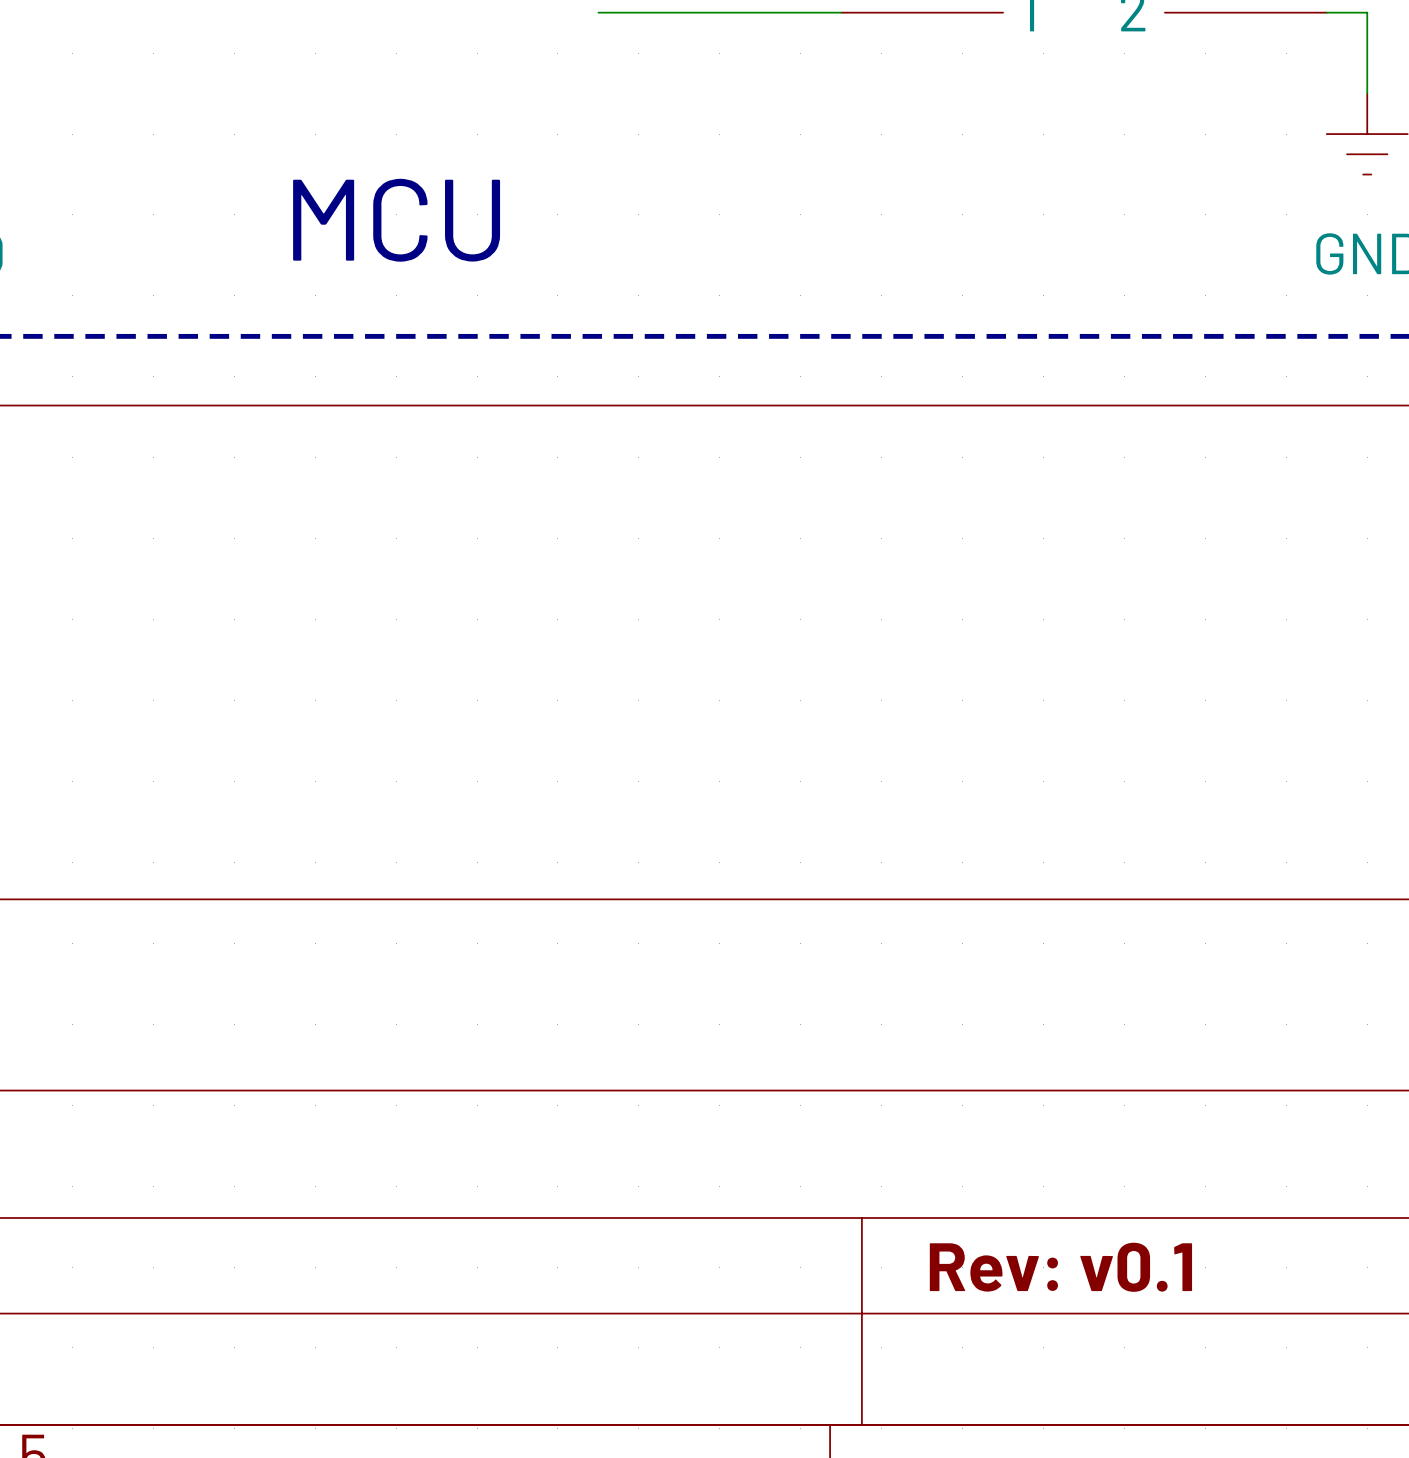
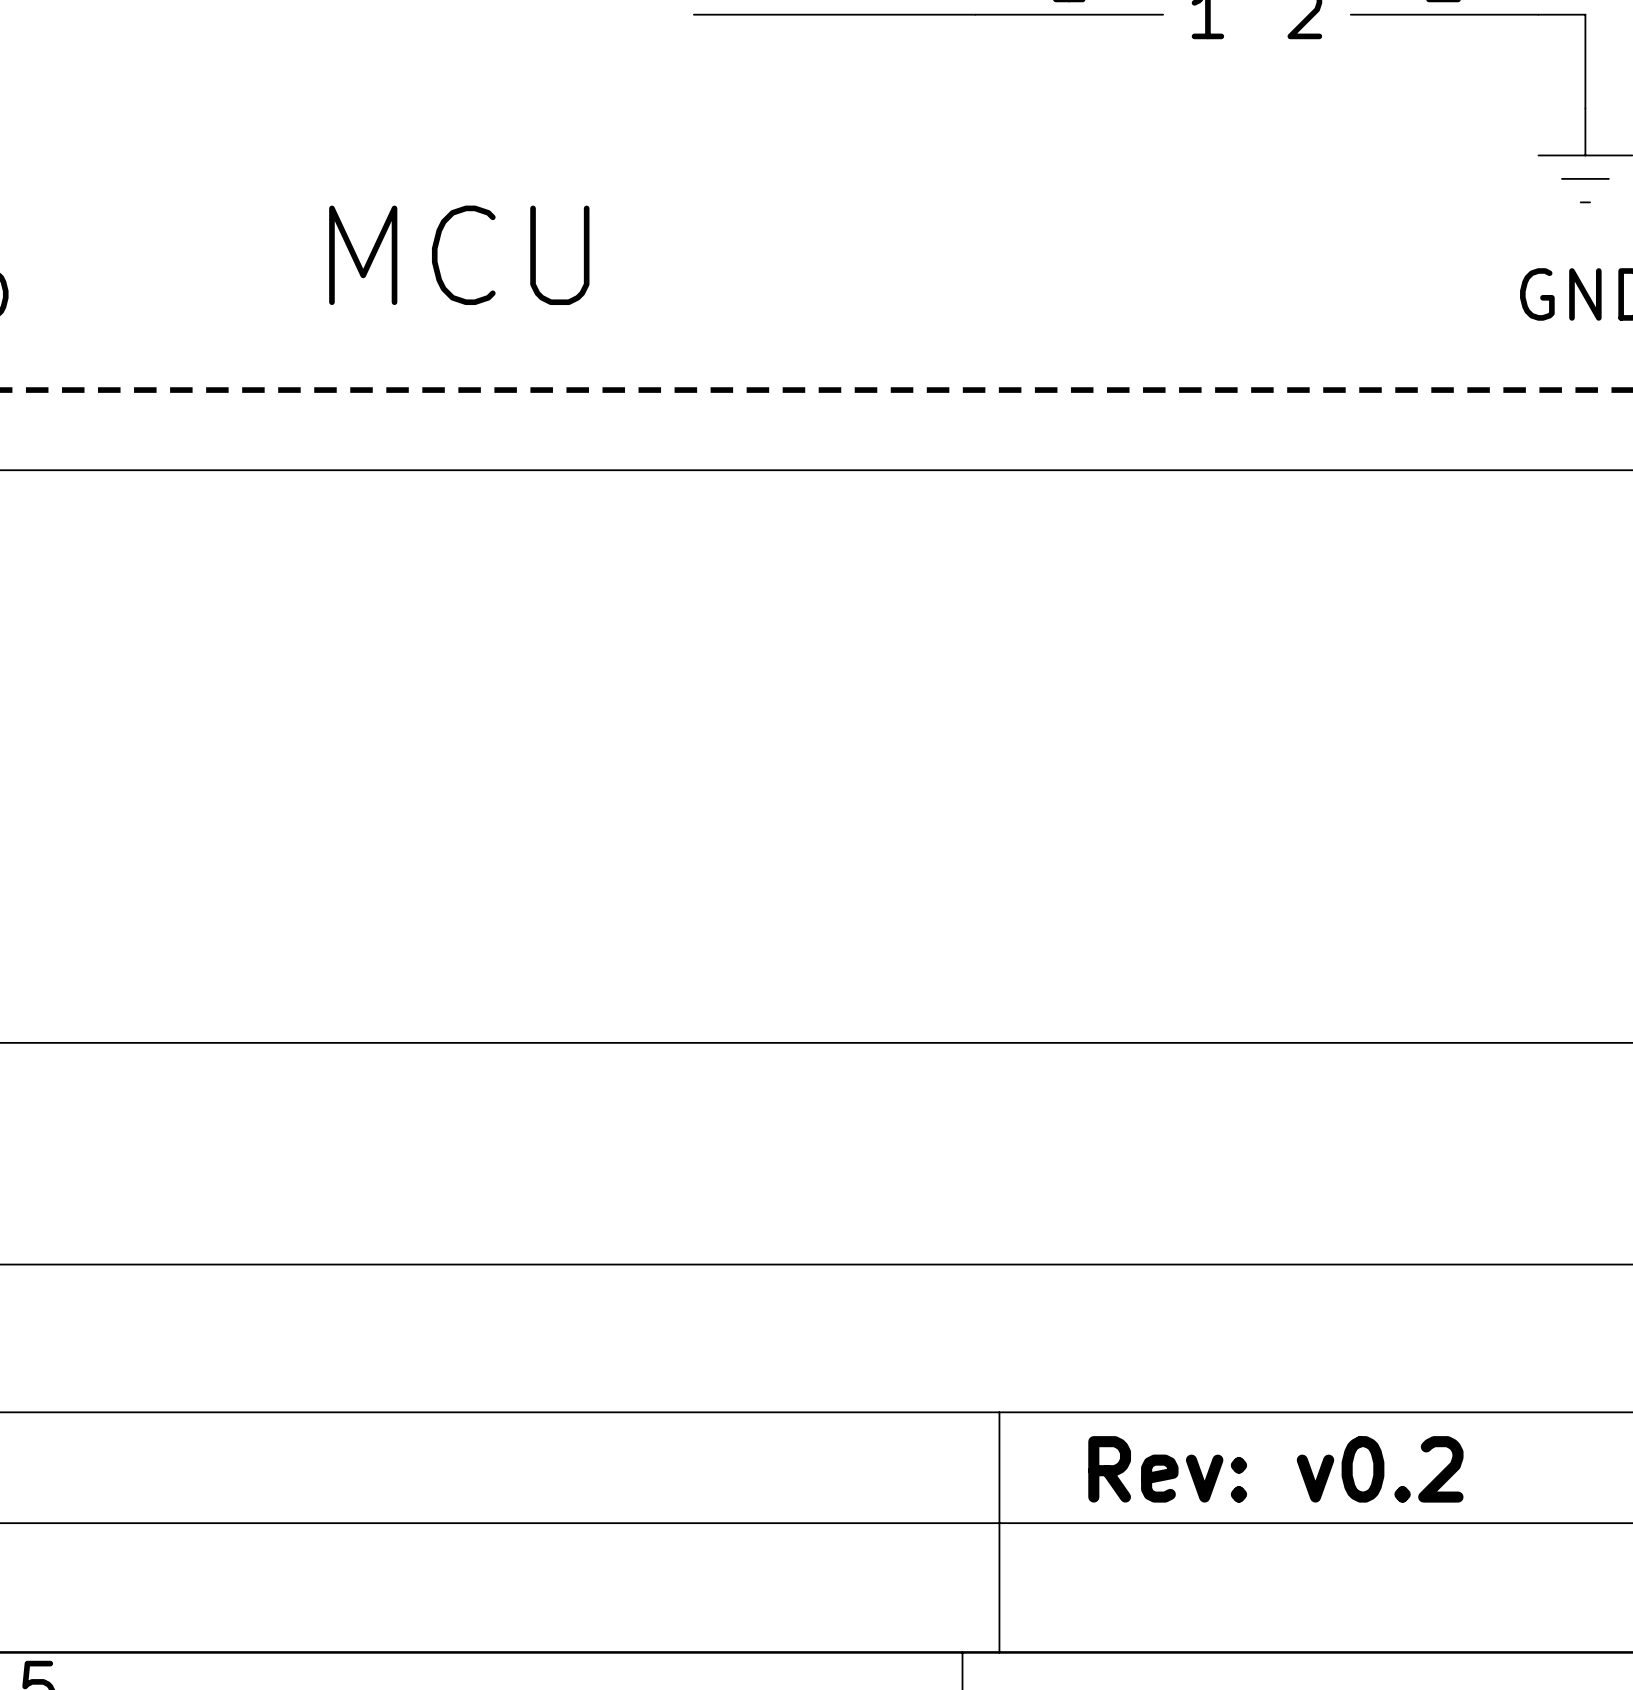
title block: Rev: v0.1 (1060, 1267) -> Rev: v0.2 (1275, 1469)

